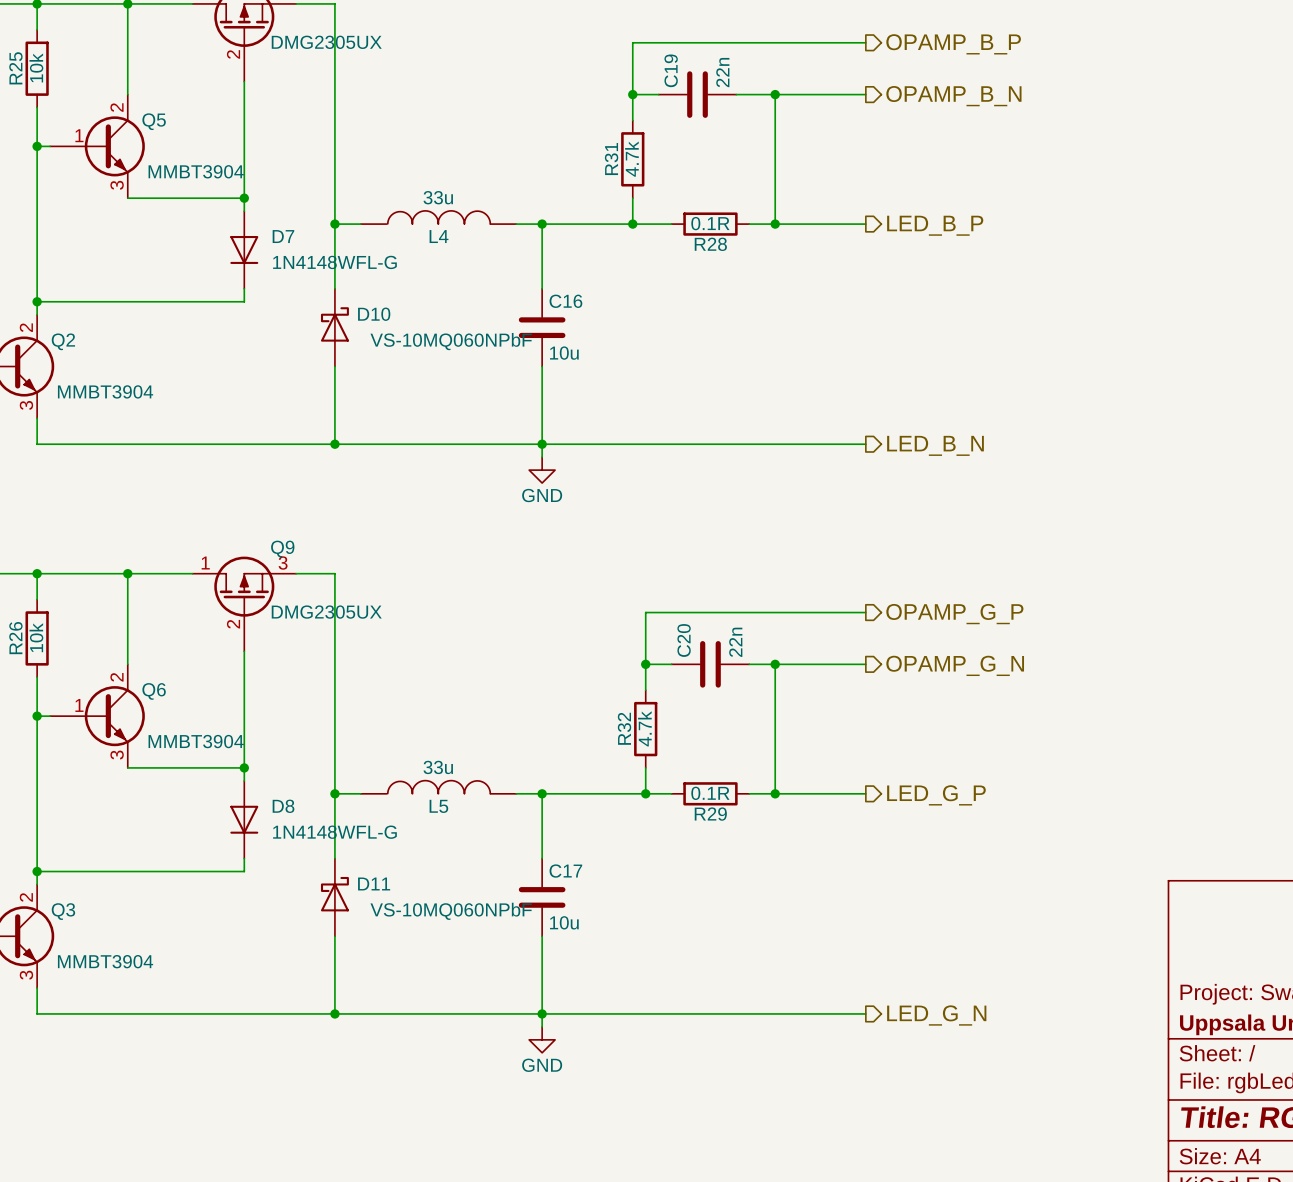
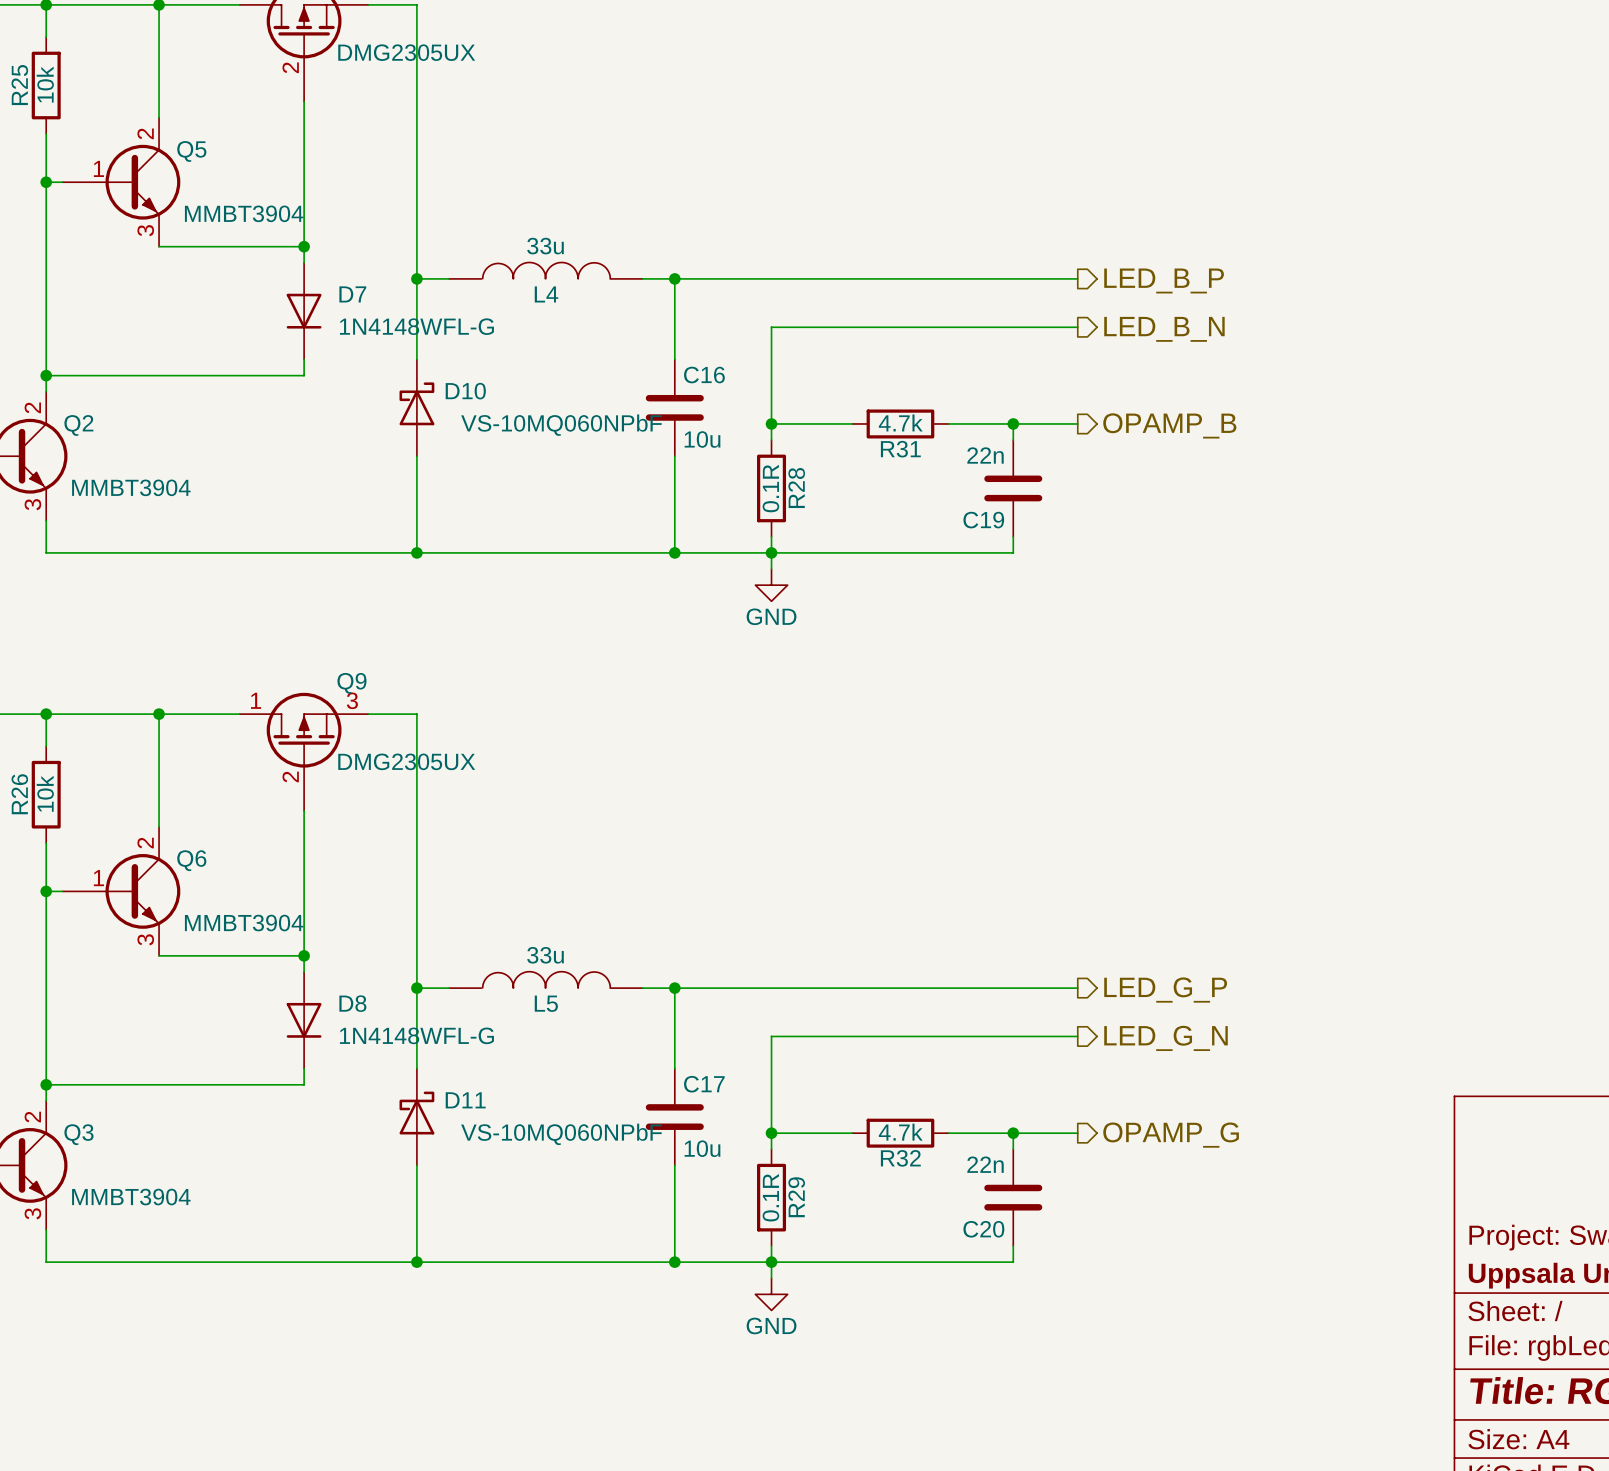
wire: (865, 42) (632, 42) (632, 120) -> none
hierarchical label: OPAMP_B_P (953, 44) -> none
C19 name position: C19 (671, 70) -> C19 (983, 520)
C19 value position: 22n (722, 72) -> 22n (985, 455)
wire: (632, 94) (658, 94) -> none
junction: (632, 94) -> none
C19 rotation: 0° (697, 94) -> 90° clockwise (1013, 488)
C19 position: (697, 94) -> (1013, 488)
wire: (736, 94) (865, 94) -> none
wire: (775, 94) (775, 224) -> none
junction: (775, 94) -> none
hierarchical label: OPAMP_B_N (953, 96) -> none
R31 name position: R31 (611, 159) -> R31 (900, 449)
R31 rotation: 0° (632, 159) -> 90° clockwise (900, 423)
R31 position: (632, 159) -> (900, 423)
wire: (632, 198) (632, 224) -> (771, 536) (771, 569)
junction: (632, 224) -> none
wire: none -> (835, 278) (932, 278)
R28 rotation: 0° (710, 224) -> 90° clockwise (771, 488)
R28 position: (710, 224) -> (771, 488)
junction: (775, 224) -> none
R28 name position: R28 (710, 244) -> R28 (796, 488)
wire: none -> (1077, 327) (771, 327) (771, 440)
wire: none -> (771, 423) (852, 423)
junction: none -> (771, 423)
wire: none -> (948, 423) (1077, 423)
wire: none -> (1013, 423) (1013, 440)
junction: none -> (1013, 423)
hierarchical label: none -> OPAMP_B (1169, 425)
wire: (542, 444) (542, 457) -> none
junction: none -> (771, 552)
wire: (814, 444) (865, 444) -> (1013, 552) (1013, 536)
hierarchical label position: LED_B_N (935, 445) -> LED_B_N (1164, 329)
power symbol position: GND (542, 470) -> GND (771, 585)
wire: (865, 612) (645, 612) (645, 690) -> none
hierarchical label: OPAMP_G_P (954, 614) -> none
C20 name position: C20 (684, 640) -> C20 (983, 1229)
C20 value position: 22n (735, 642) -> 22n (985, 1164)
wire: (645, 664) (671, 664) -> none
junction: (645, 664) -> none
C20 rotation: 0° (710, 664) -> 90° clockwise (1013, 1197)
C20 position: (710, 664) -> (1013, 1197)
wire: (749, 664) (865, 664) -> none
wire: (775, 664) (775, 793) -> none
junction: (775, 664) -> none
hierarchical label: OPAMP_G_N (955, 665) -> none
R32 name position: R32 (624, 728) -> R32 (900, 1158)
R32 rotation: 0° (645, 729) -> 90° clockwise (900, 1133)
R32 position: (645, 729) -> (900, 1133)
wire: (645, 767) (645, 793) -> (771, 1246) (771, 1278)
junction: (645, 793) -> none
wire: none -> (835, 988) (932, 988)
R29 rotation: 0° (710, 793) -> 90° clockwise (771, 1197)
R29 position: (710, 793) -> (771, 1197)
junction: (775, 793) -> none
R29 name position: R29 (710, 814) -> R29 (796, 1197)
wire: none -> (1077, 1036) (771, 1036) (771, 1149)
wire: none -> (771, 1133) (852, 1133)
junction: none -> (771, 1133)
wire: none -> (948, 1133) (1077, 1133)
wire: none -> (1013, 1133) (1013, 1149)
junction: none -> (1013, 1133)
hierarchical label: none -> OPAMP_G (1171, 1135)
wire: (542, 1013) (542, 1026) -> none
junction: none -> (771, 1262)
wire: (814, 1013) (865, 1013) -> (1013, 1262) (1013, 1246)
hierarchical label position: LED_G_N (936, 1015) -> LED_G_N (1166, 1038)
power symbol position: GND (542, 1039) -> GND (771, 1294)

